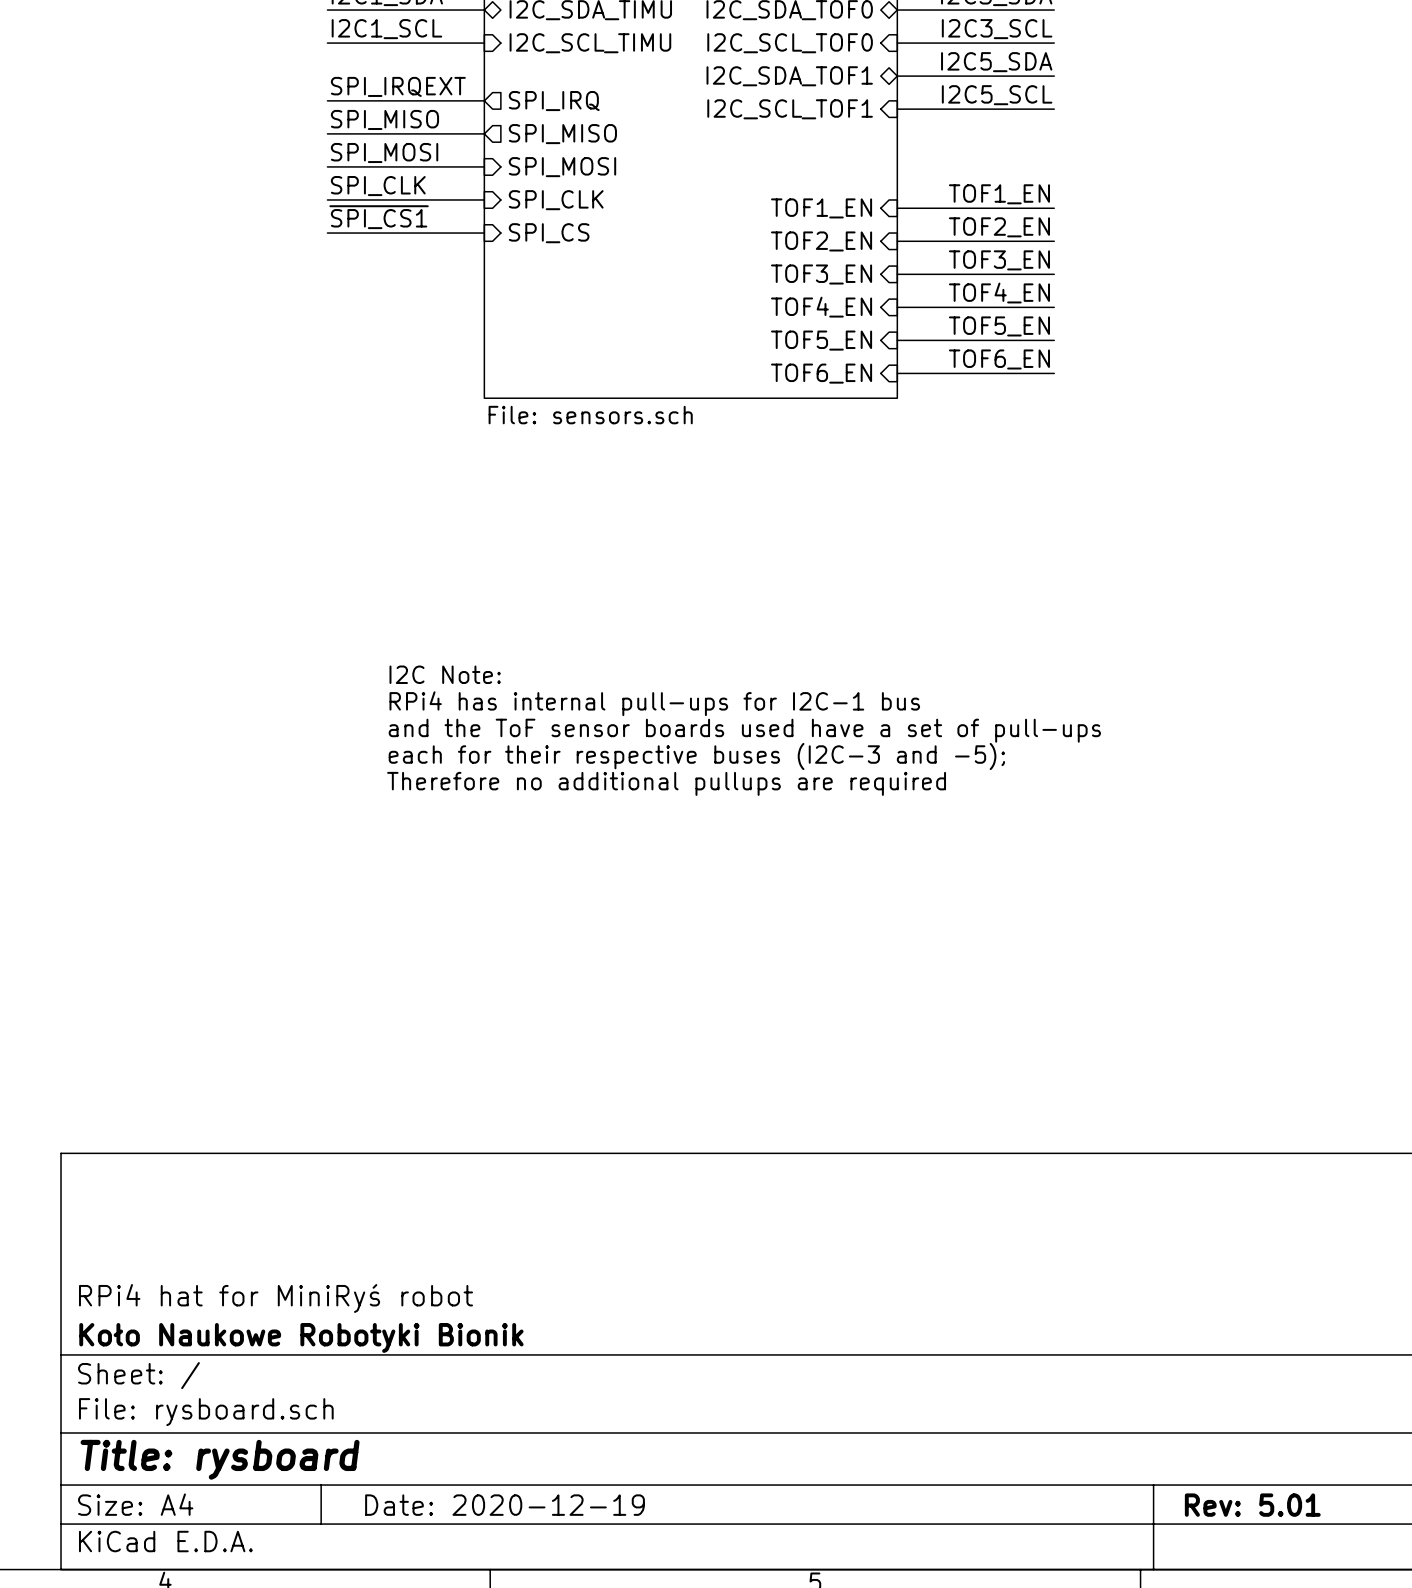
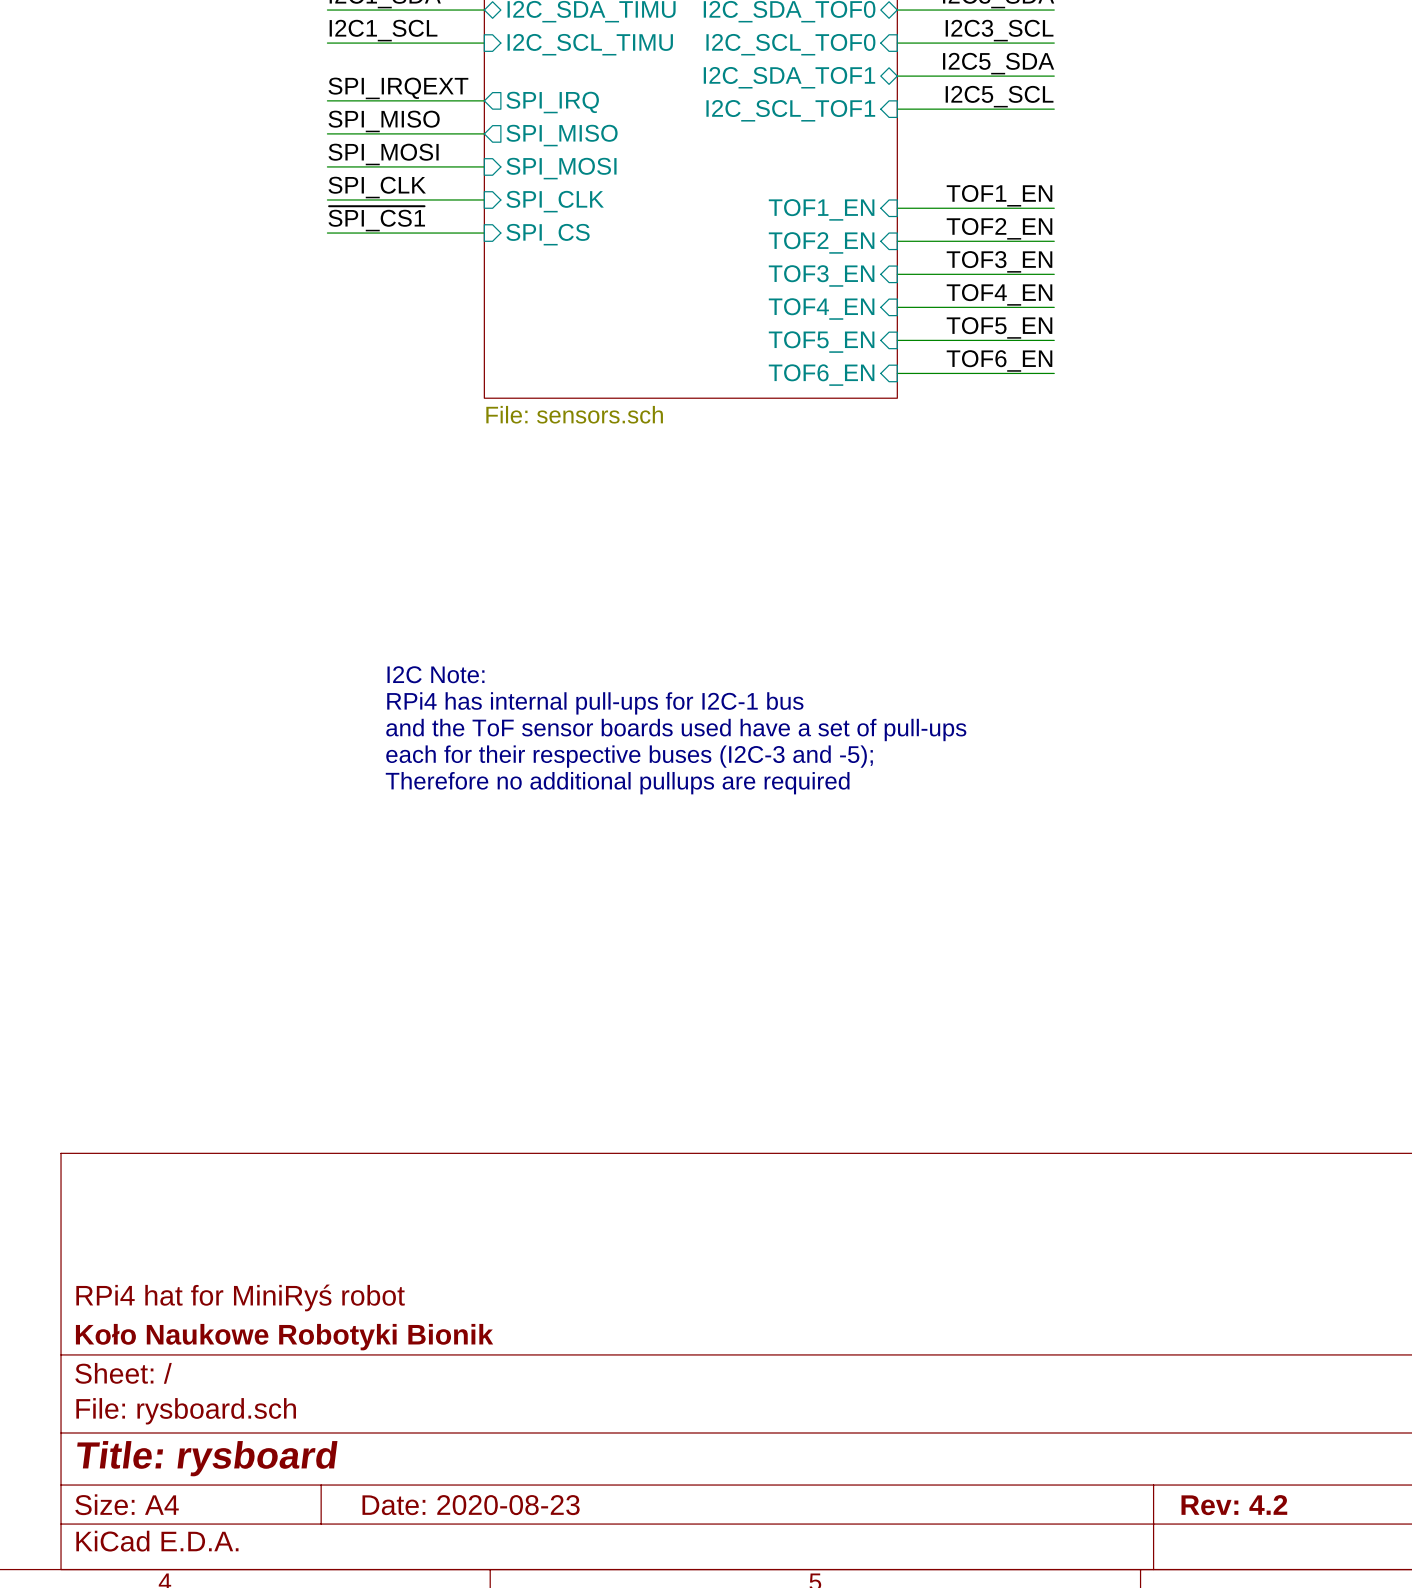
title block: Date: 2020-12-19 (505, 1505) -> Date: 2020-08-23 (471, 1505)
title block: Rev: 5.01 (1252, 1505) -> Rev: 4.2 (1234, 1505)

